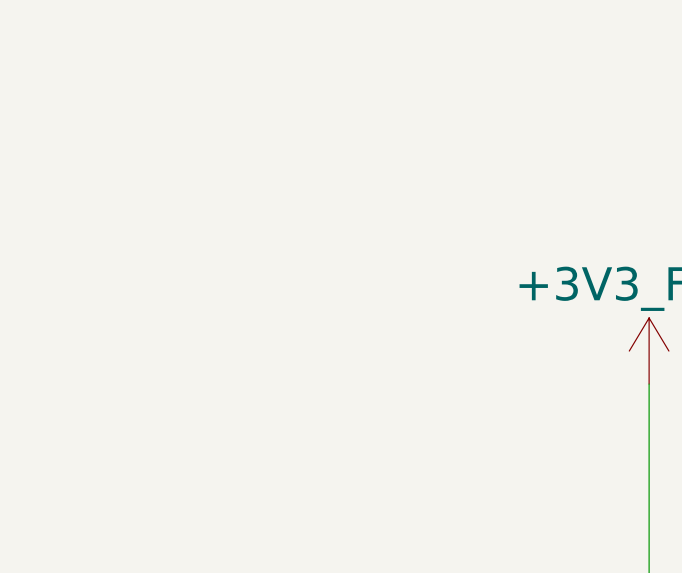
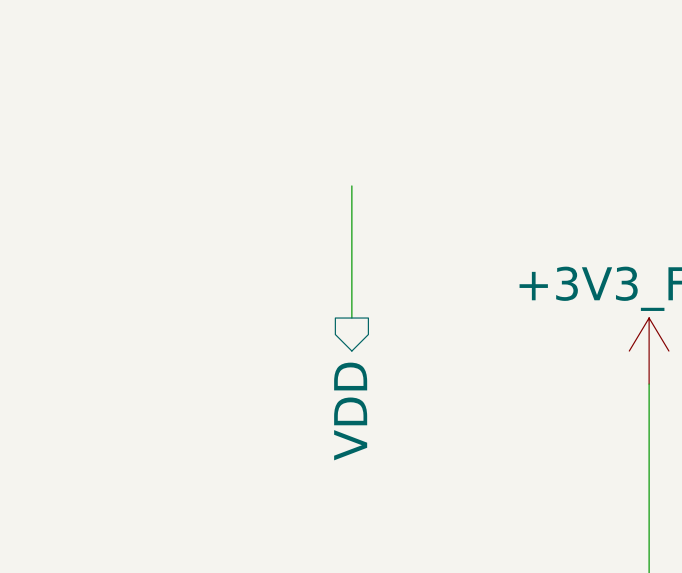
wire: none -> (351, 185) (351, 318)
sheet pin: none -> VDD (350, 411)

